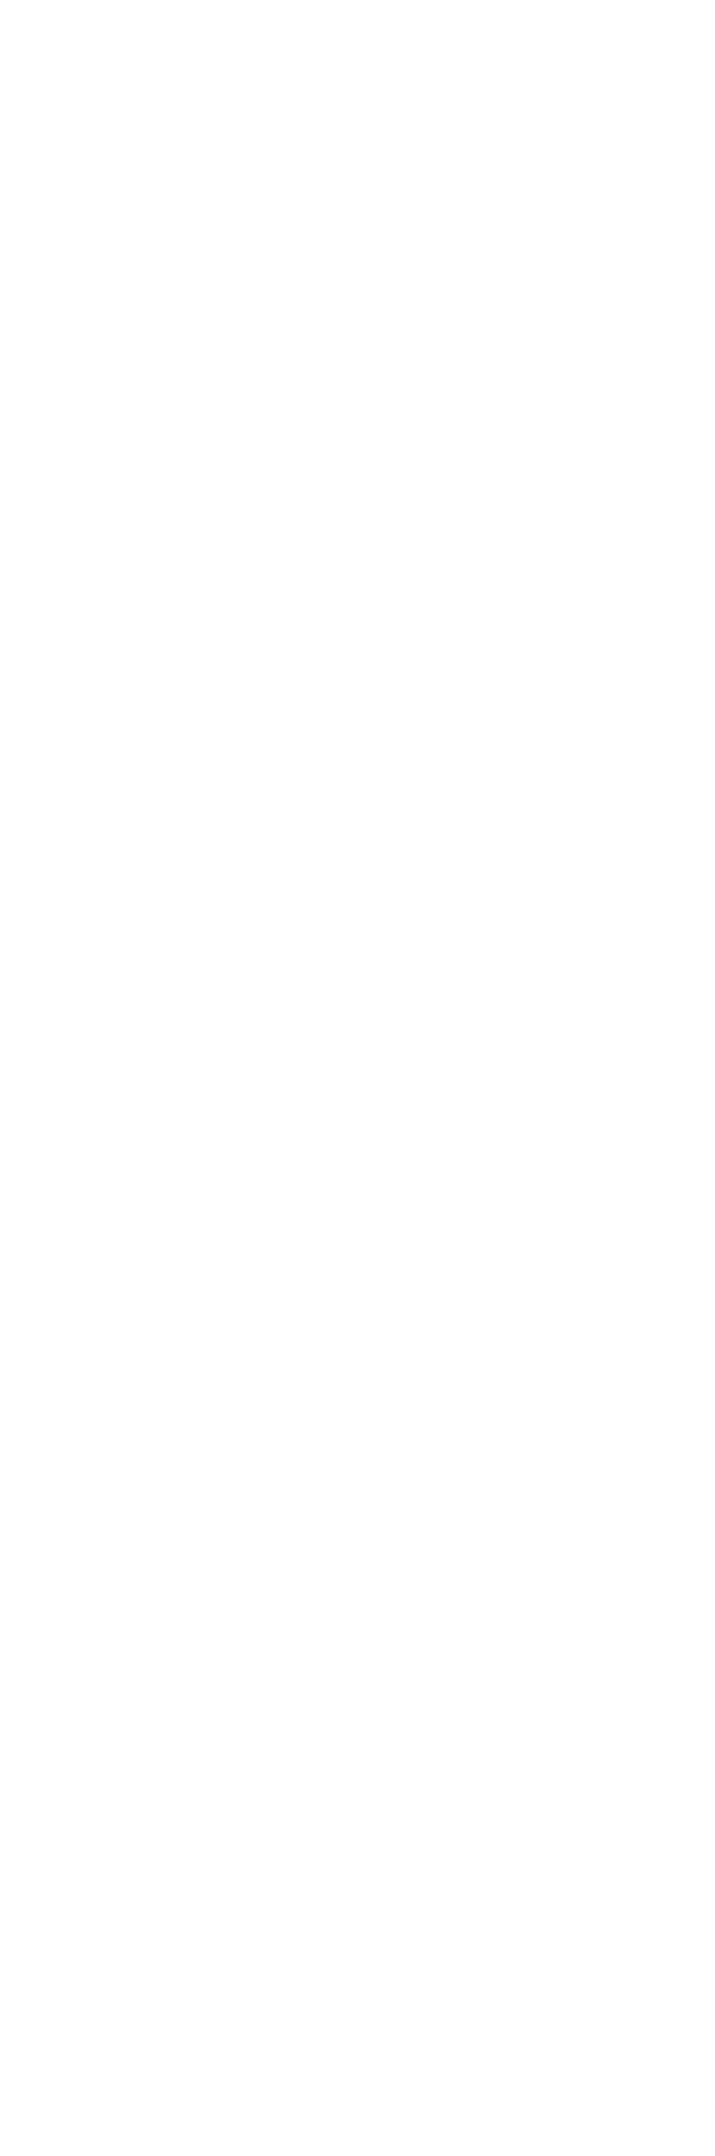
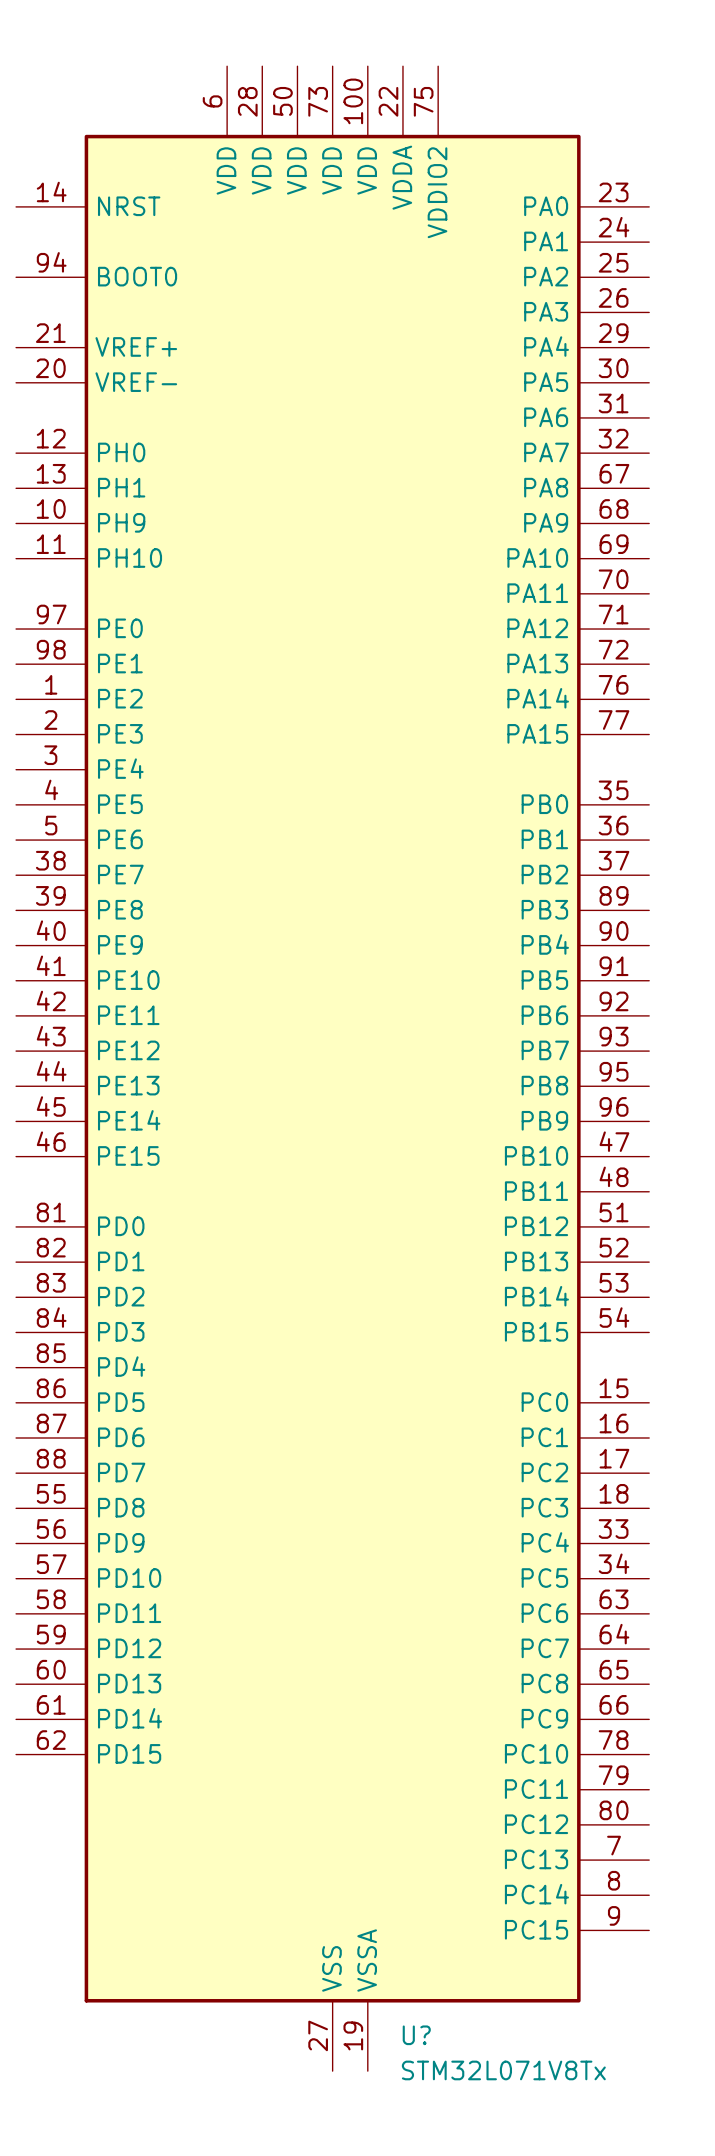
U?: none -> STM32L071V8Tx (332, 1068)

